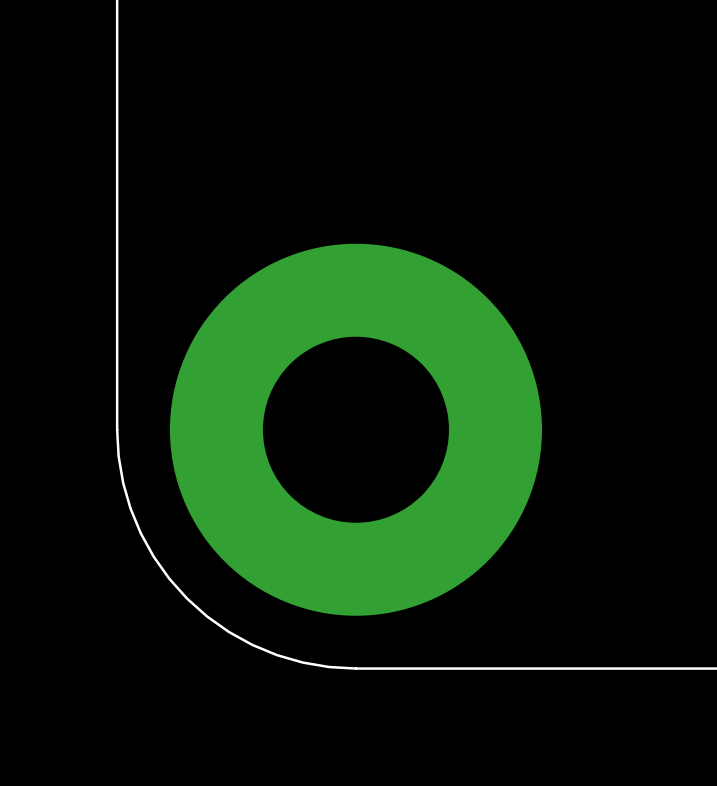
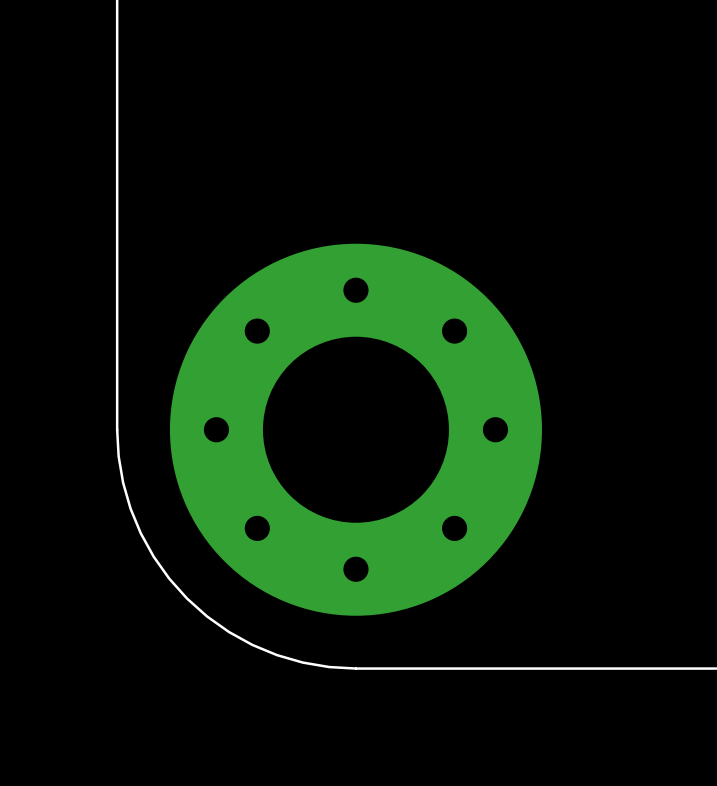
part footprint: [169, 243, 542, 616] -> [169, 243, 542, 616]

